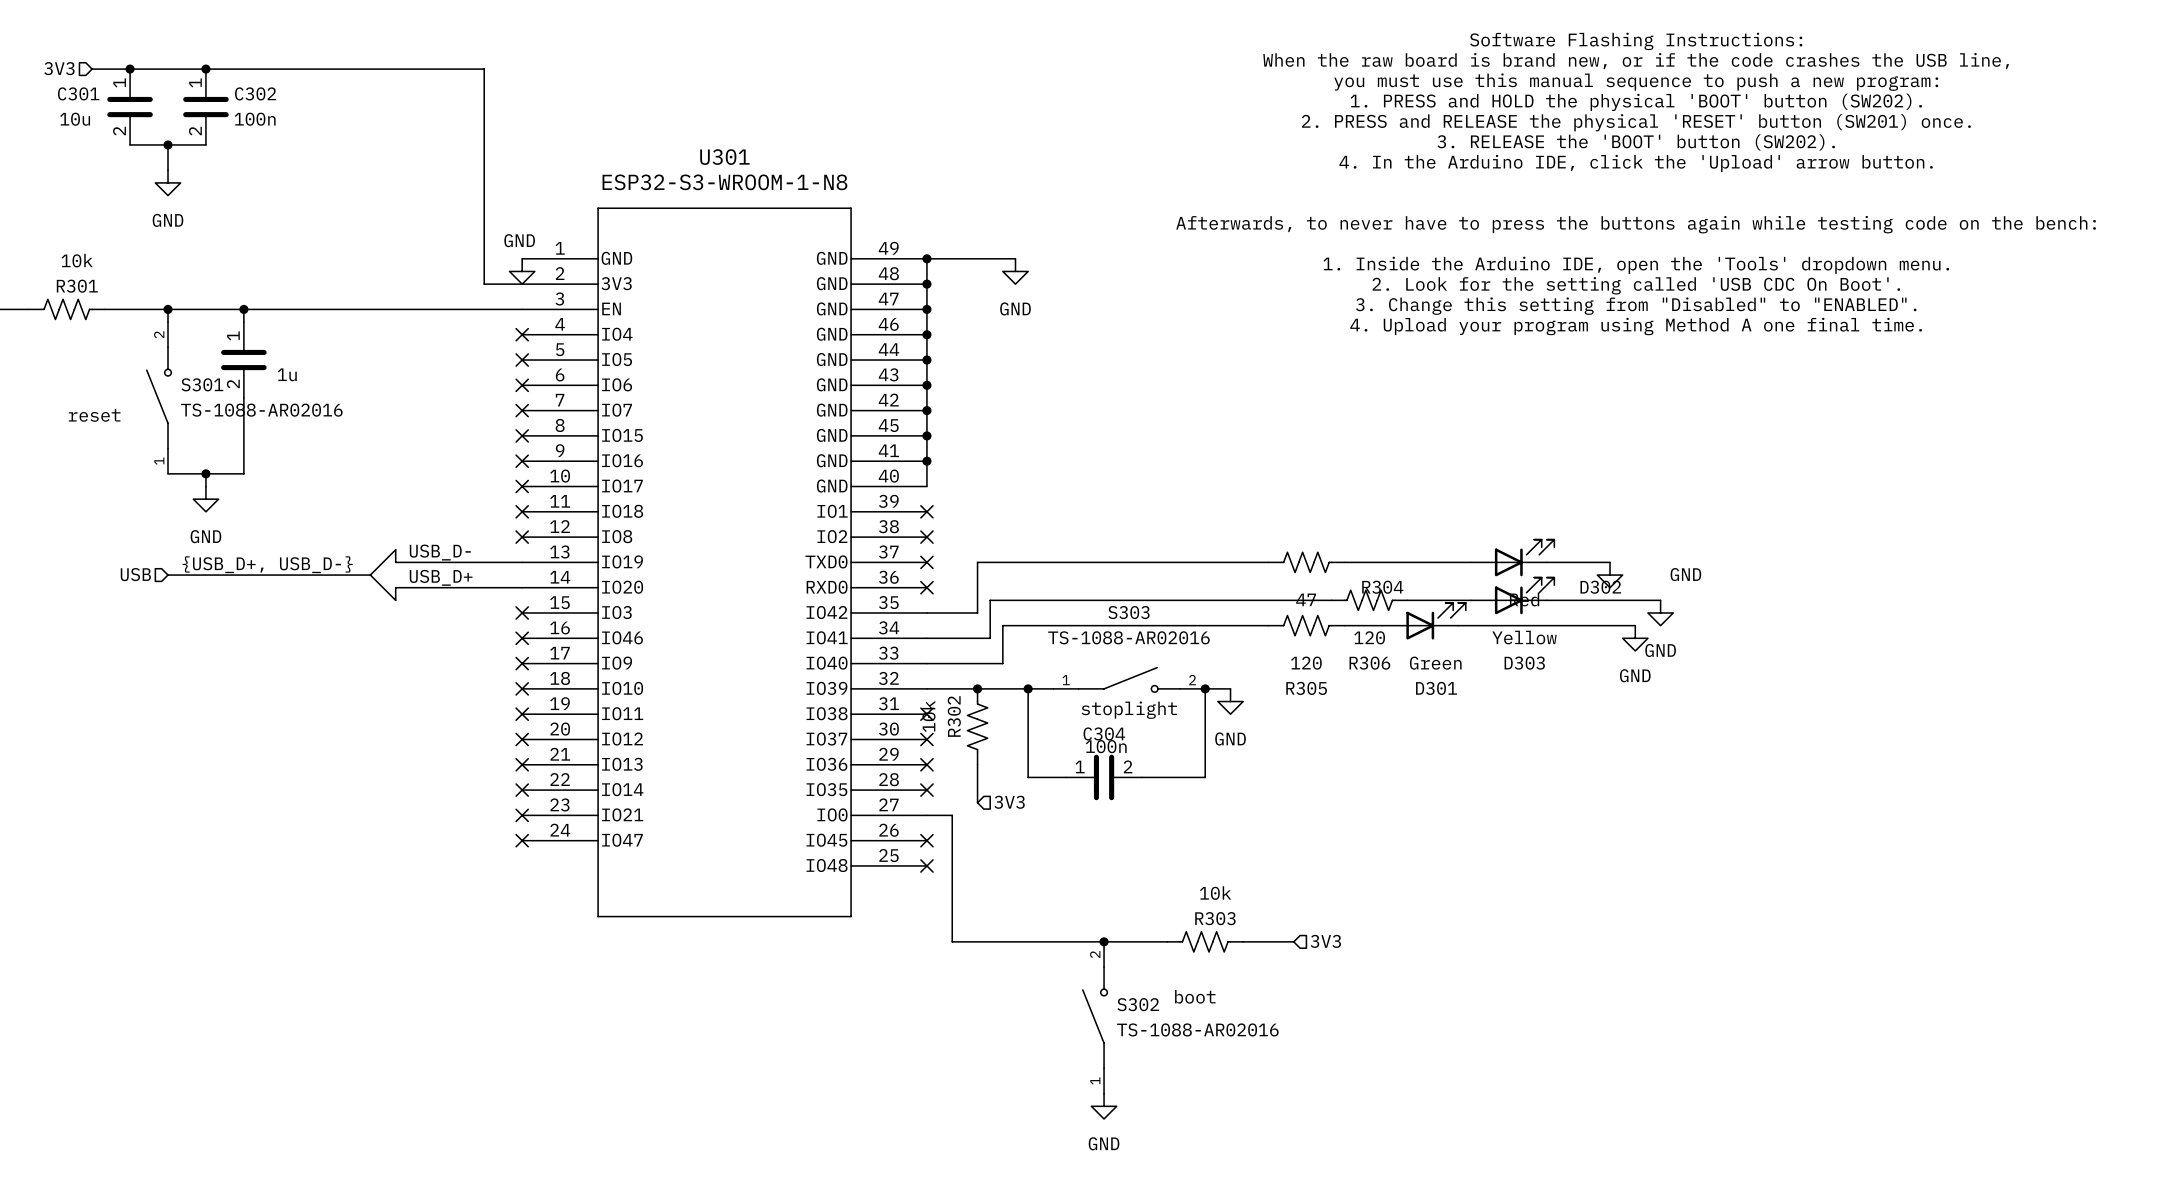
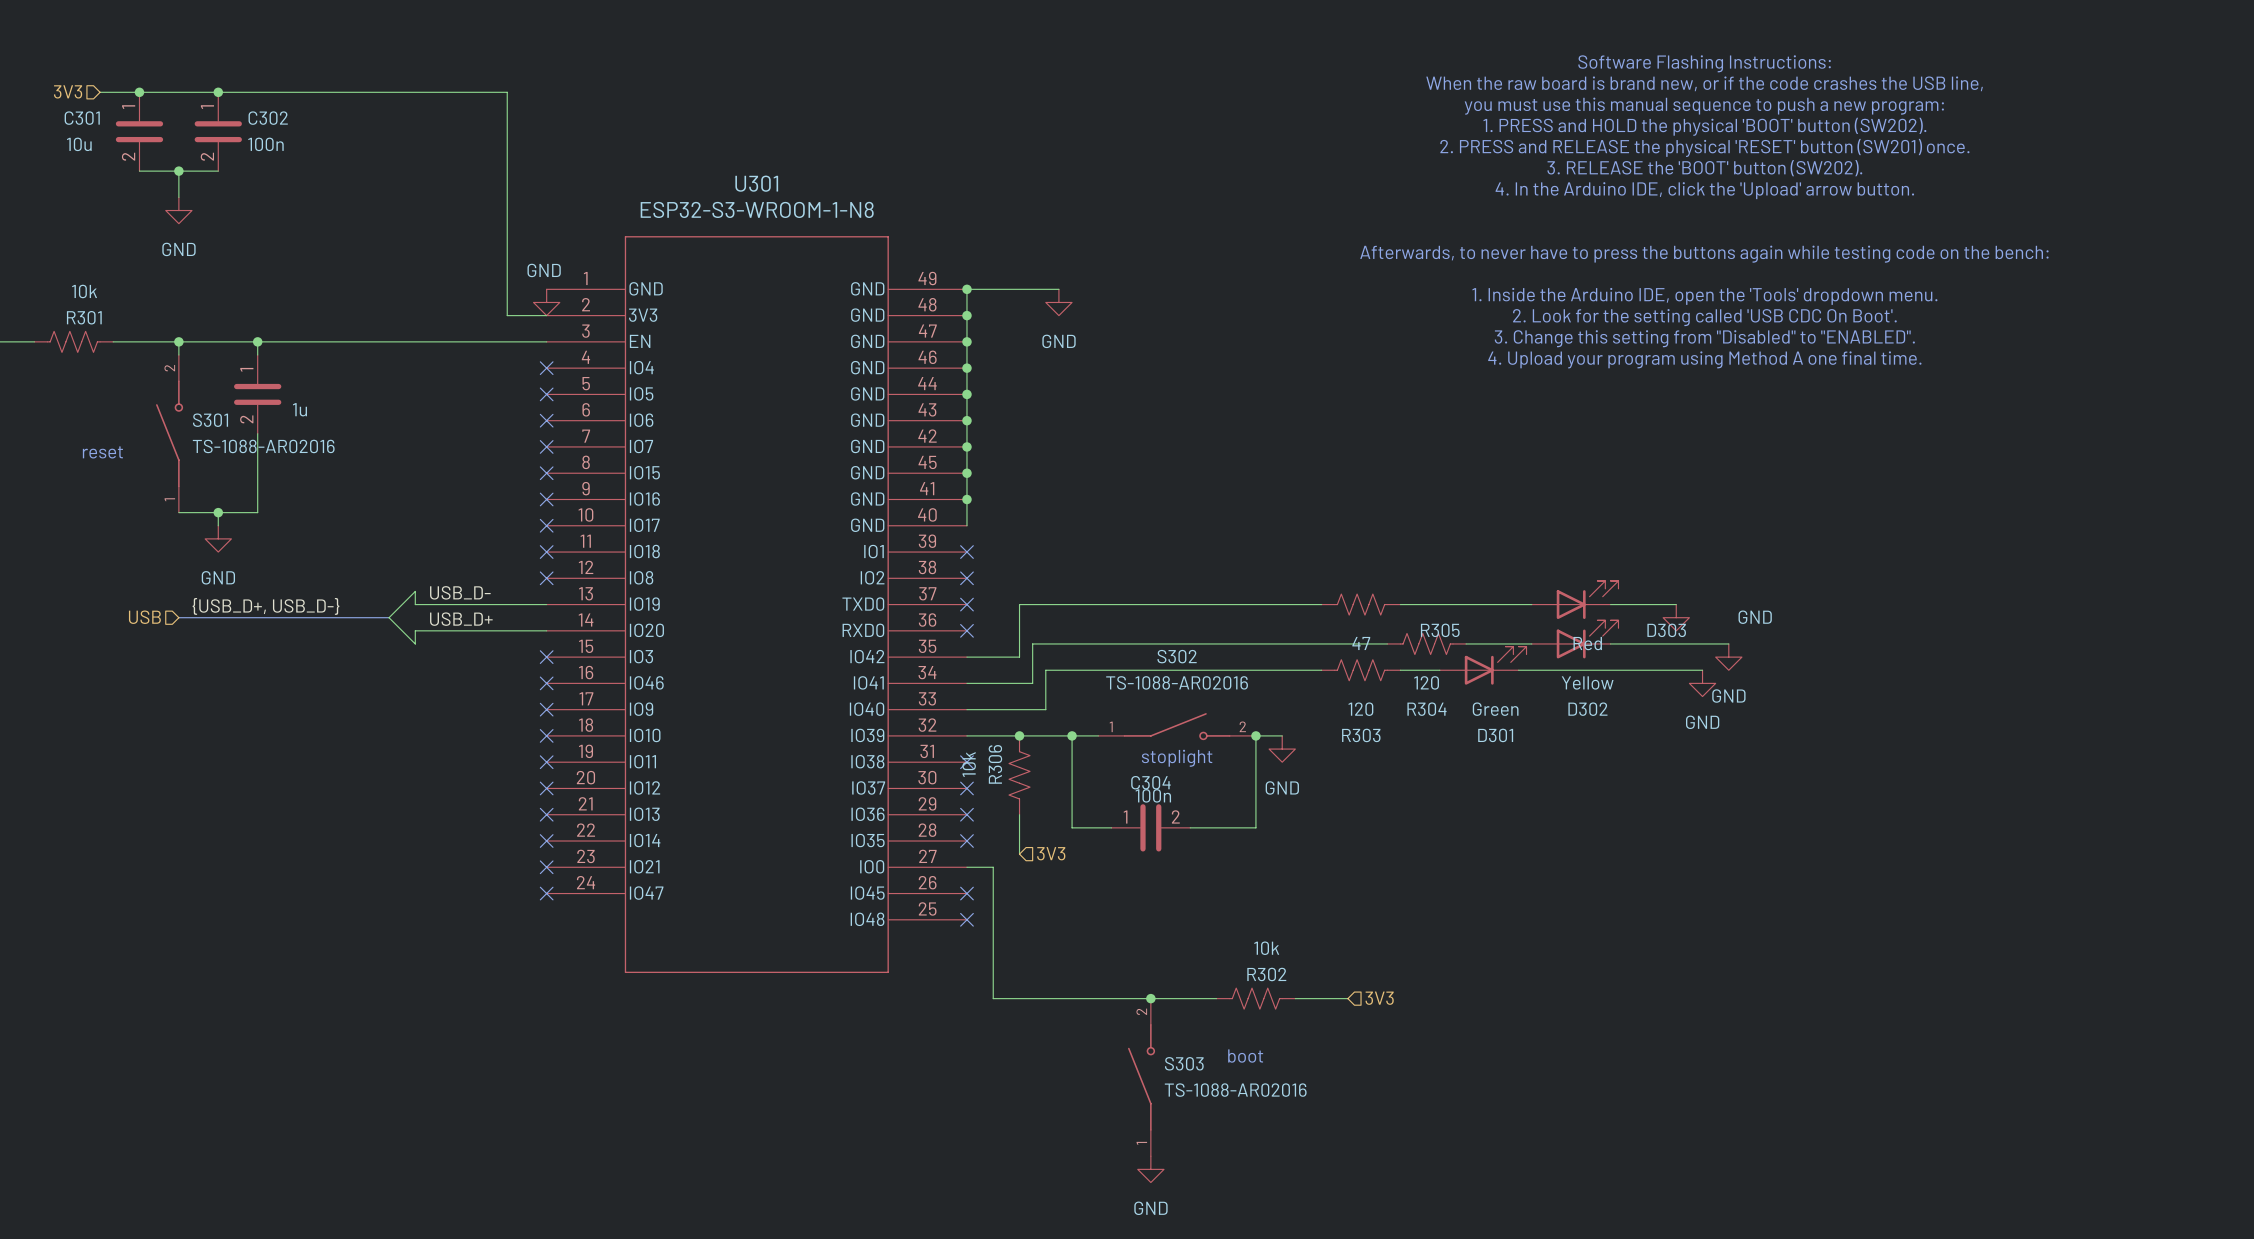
R304 name: R304 (1382, 587) -> R305 (1440, 630)
D302 name: D302 (1600, 587) -> D303 (1666, 630)
S303 name: S303 (1129, 612) -> S302 (1177, 656)
R306 name: R306 (1369, 663) -> R304 (1427, 709)
D303 name: D303 (1524, 663) -> D302 (1587, 709)
R305 name: R305 (1306, 688) -> R303 (1361, 735)
R302 name: R302 (954, 716) -> R306 (995, 764)
R303 name: R303 (1215, 918) -> R302 (1266, 974)
S302 name: S302 (1138, 1004) -> S303 (1184, 1063)

